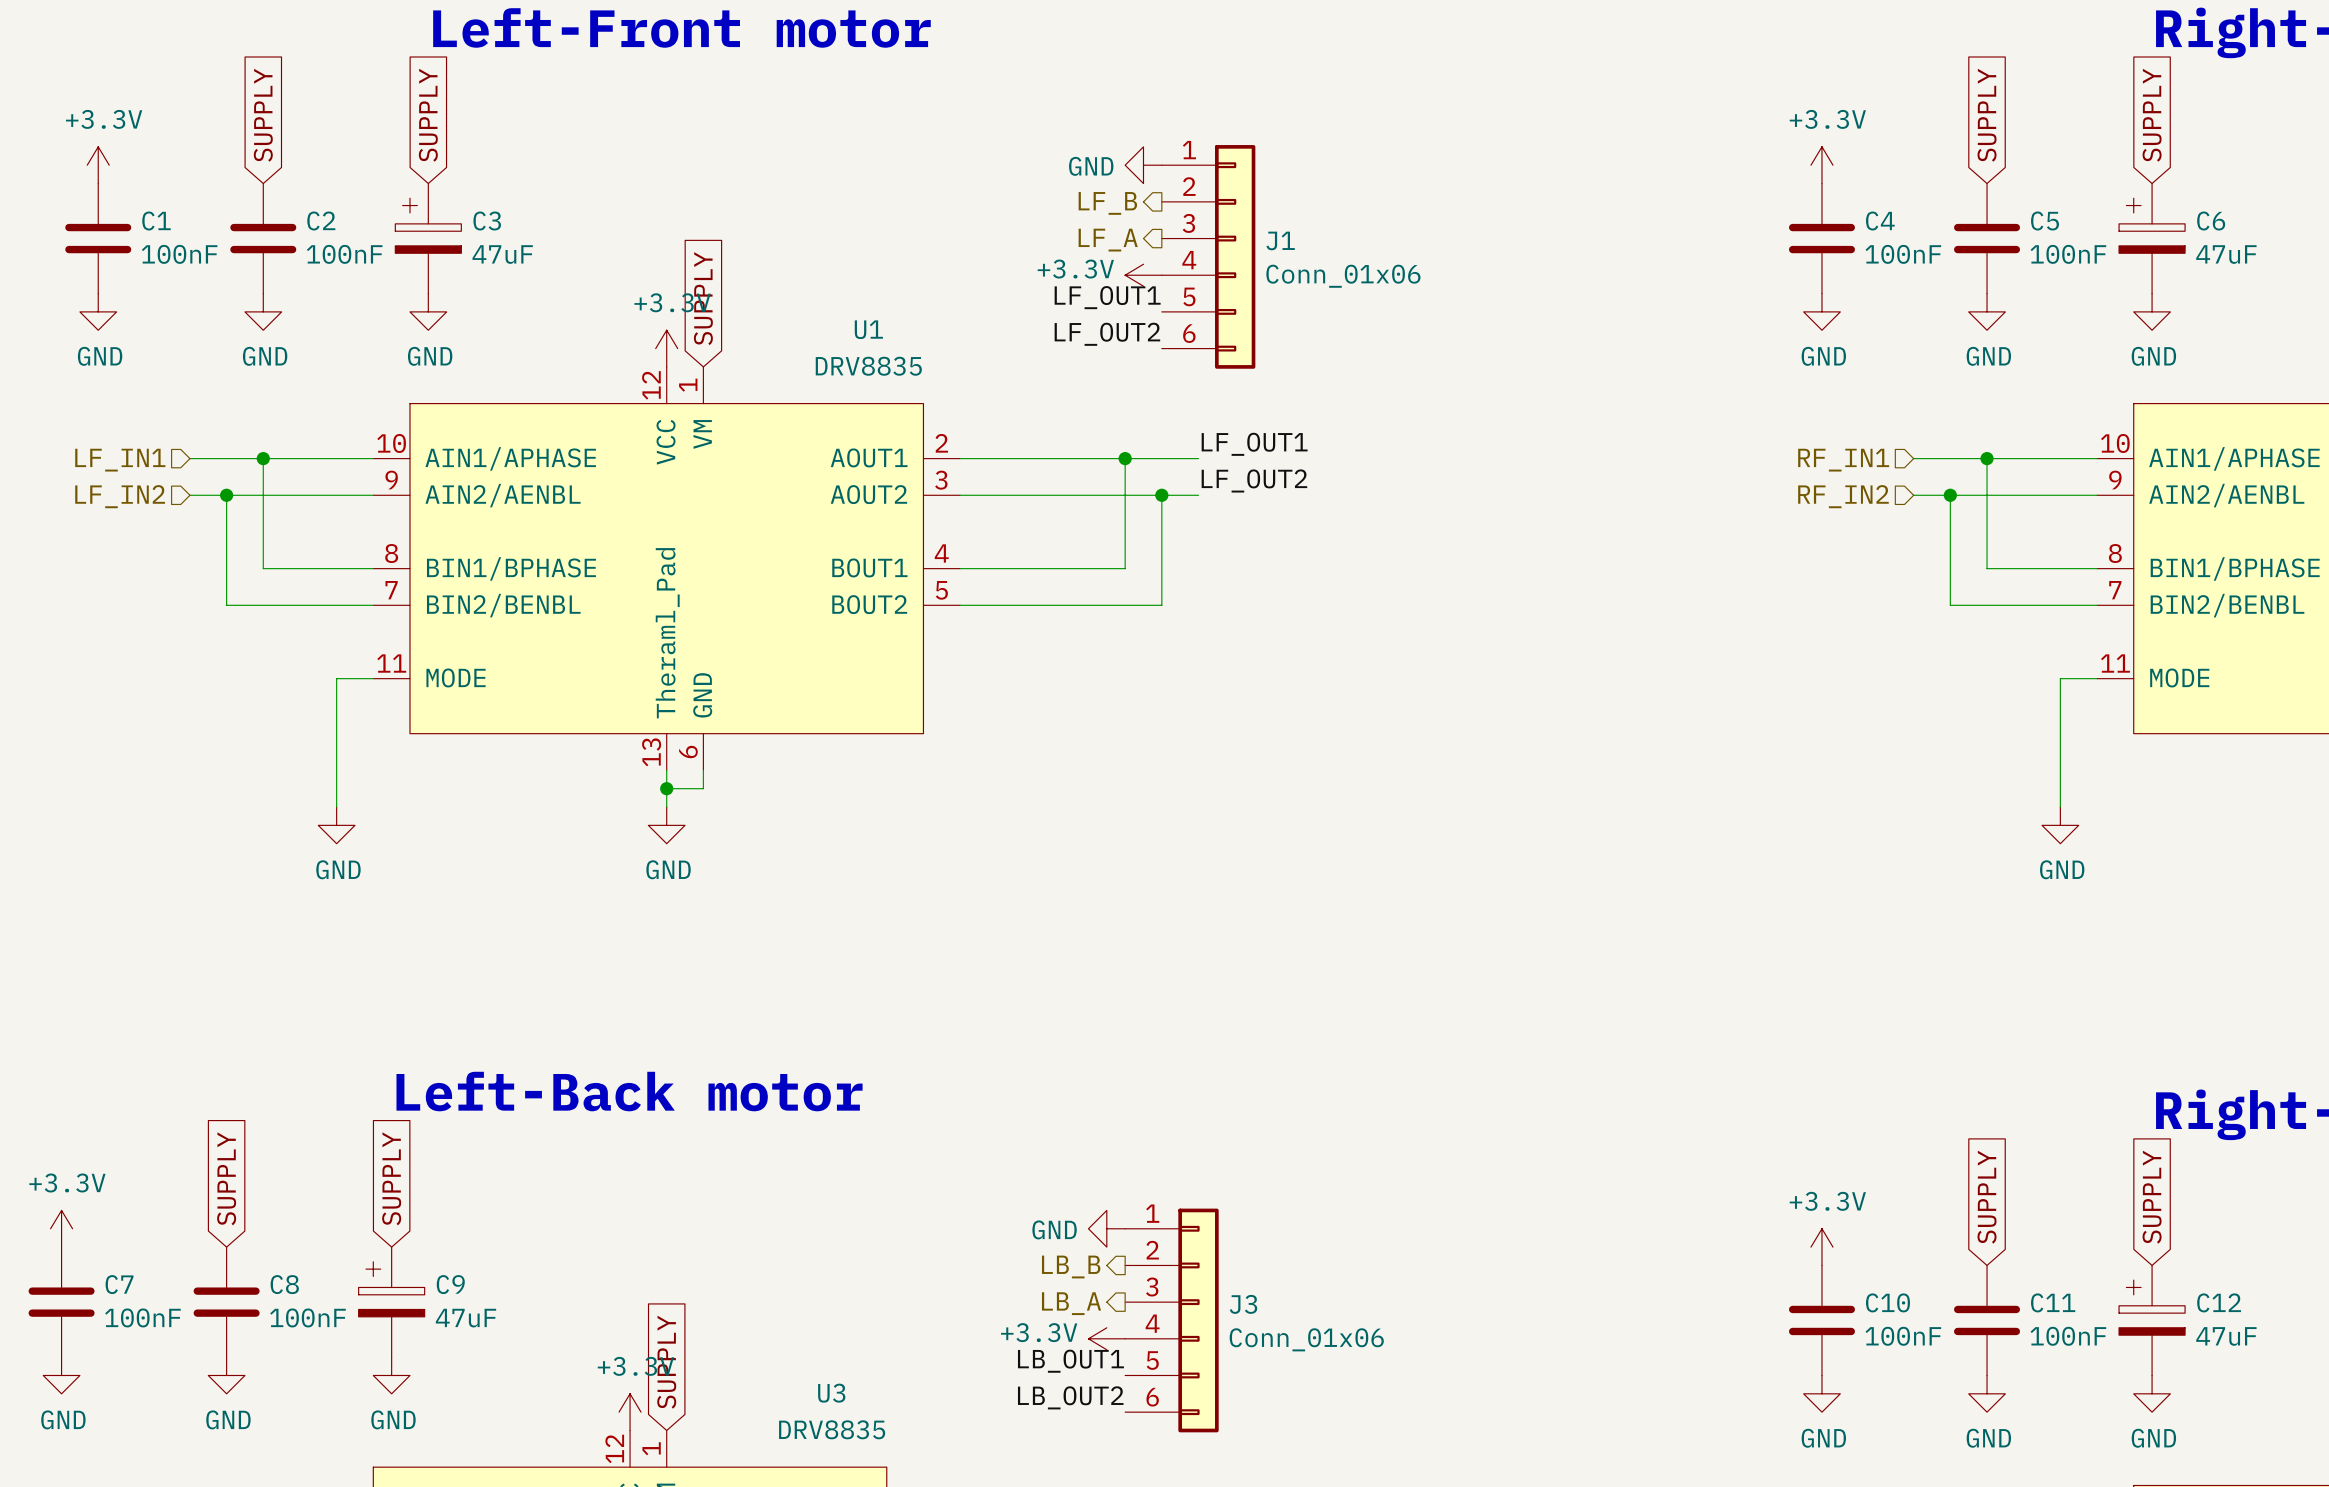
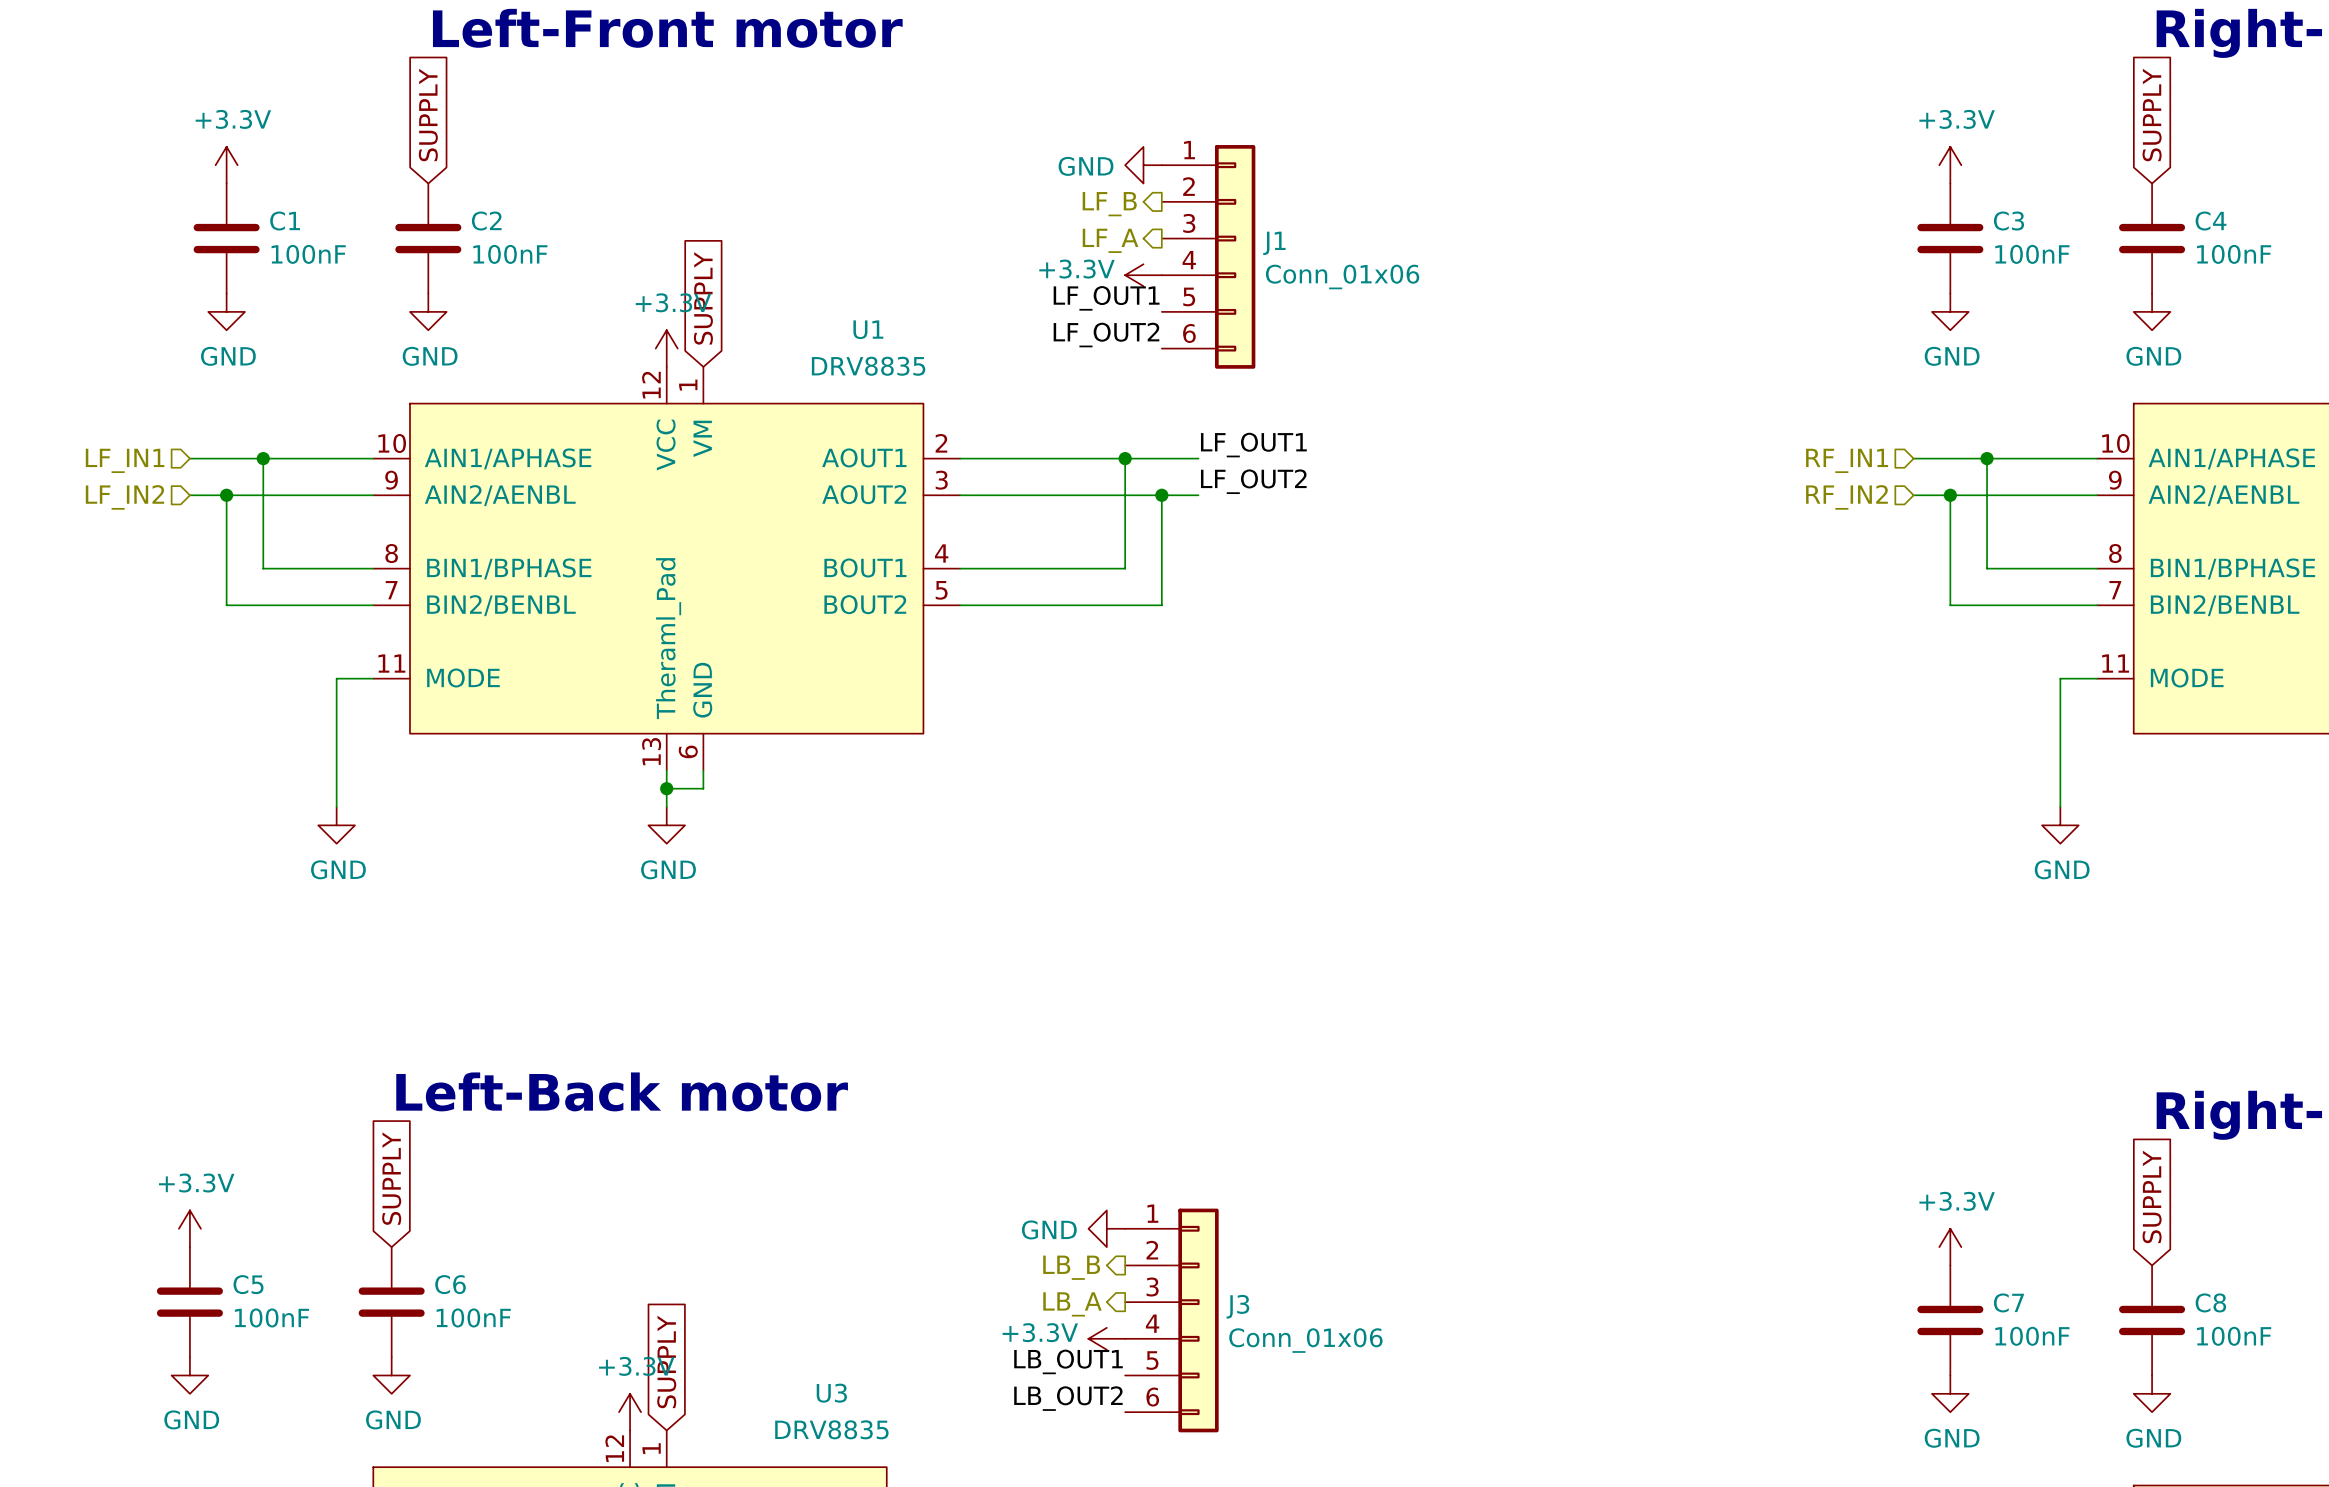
global label: SUPPLY (263, 115) -> none
global label: SUPPLY (1987, 115) -> none
power symbol position: +3.3V (98, 165) -> +3.3V (226, 165)
power symbol position: +3.3V (1821, 165) -> +3.3V (1950, 165)
C3 symbol: [395, 183, 462, 294] -> [1917, 183, 1984, 294]
C6 symbol: [2119, 183, 2186, 294] -> [358, 1247, 425, 1358]
C1 position: (98, 238) -> (226, 238)
C2 position: (263, 238) -> (428, 238)
C4 position: (1821, 238) -> (2152, 238)
C5 position: (1987, 238) -> (189, 1302)
C3 value: 47uF (502, 254) -> 100nF (2032, 254)
C6 value: 47uF (2226, 254) -> 100nF (473, 1317)
power symbol: GND (98, 311) -> none
power symbol position: GND (263, 311) -> GND (226, 311)
power symbol: GND (1821, 311) -> none
power symbol position: GND (1987, 311) -> GND (1950, 311)
global label: SUPPLY (226, 1178) -> none
global label: SUPPLY (1987, 1197) -> none
power symbol position: +3.3V (61, 1228) -> +3.3V (189, 1228)
power symbol position: +3.3V (1821, 1247) -> +3.3V (1950, 1247)
C7 position: (61, 1302) -> (1950, 1320)
C8 position: (226, 1302) -> (2152, 1320)
C9: 47uF (391, 1302) -> none
C10: 100nF (1821, 1320) -> none
C11: 100nF (1987, 1320) -> none
C12: 47uF (2152, 1320) -> none
power symbol: GND (61, 1375) -> none
power symbol position: GND (226, 1375) -> GND (189, 1375)
power symbol: GND (1821, 1393) -> none
power symbol position: GND (1987, 1393) -> GND (1950, 1393)

